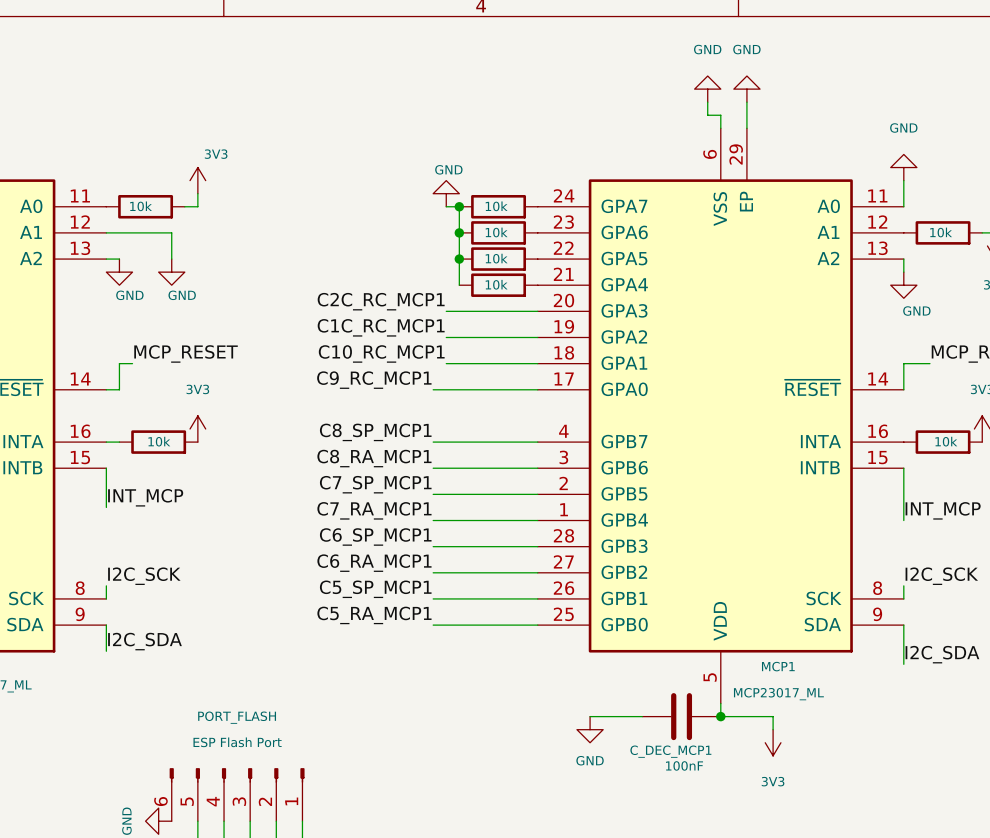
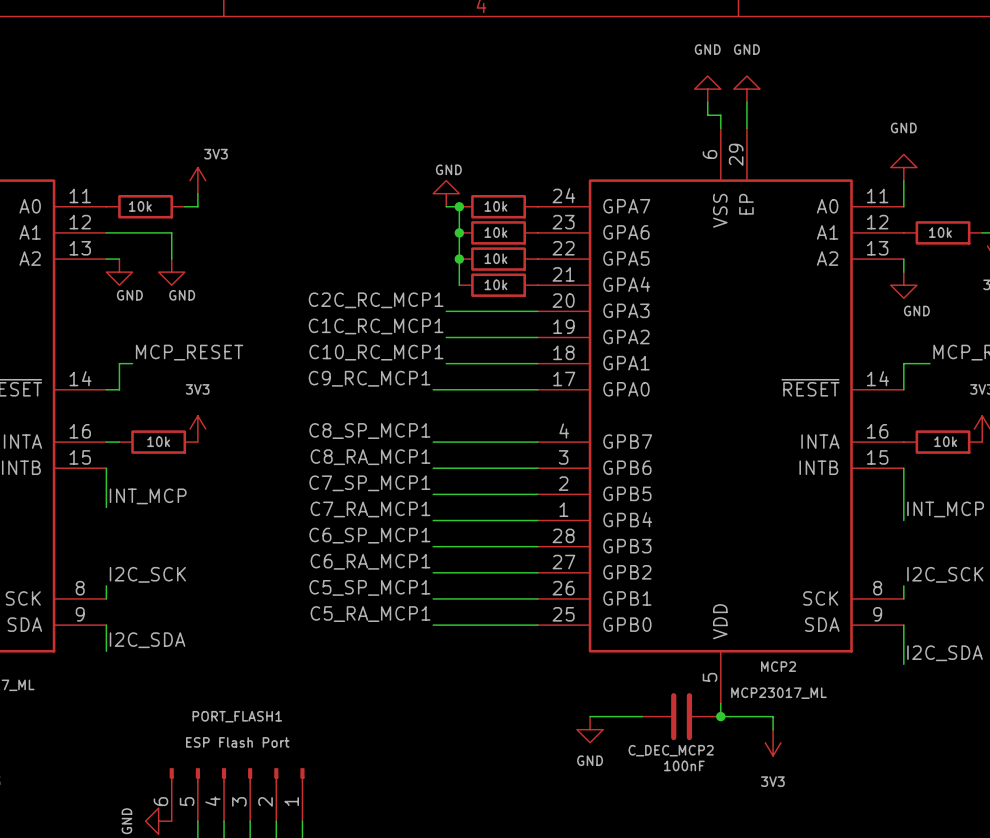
MCP1 name: MCP1 (778, 666) -> MCP2 (778, 666)
PORT_FLASH name: PORT_FLASH (237, 717) -> PORT_FLASH1 (237, 716)
C_DEC_MCP1 name: C_DEC_MCP1 (670, 751) -> C_DEC_MCP2 (671, 750)

